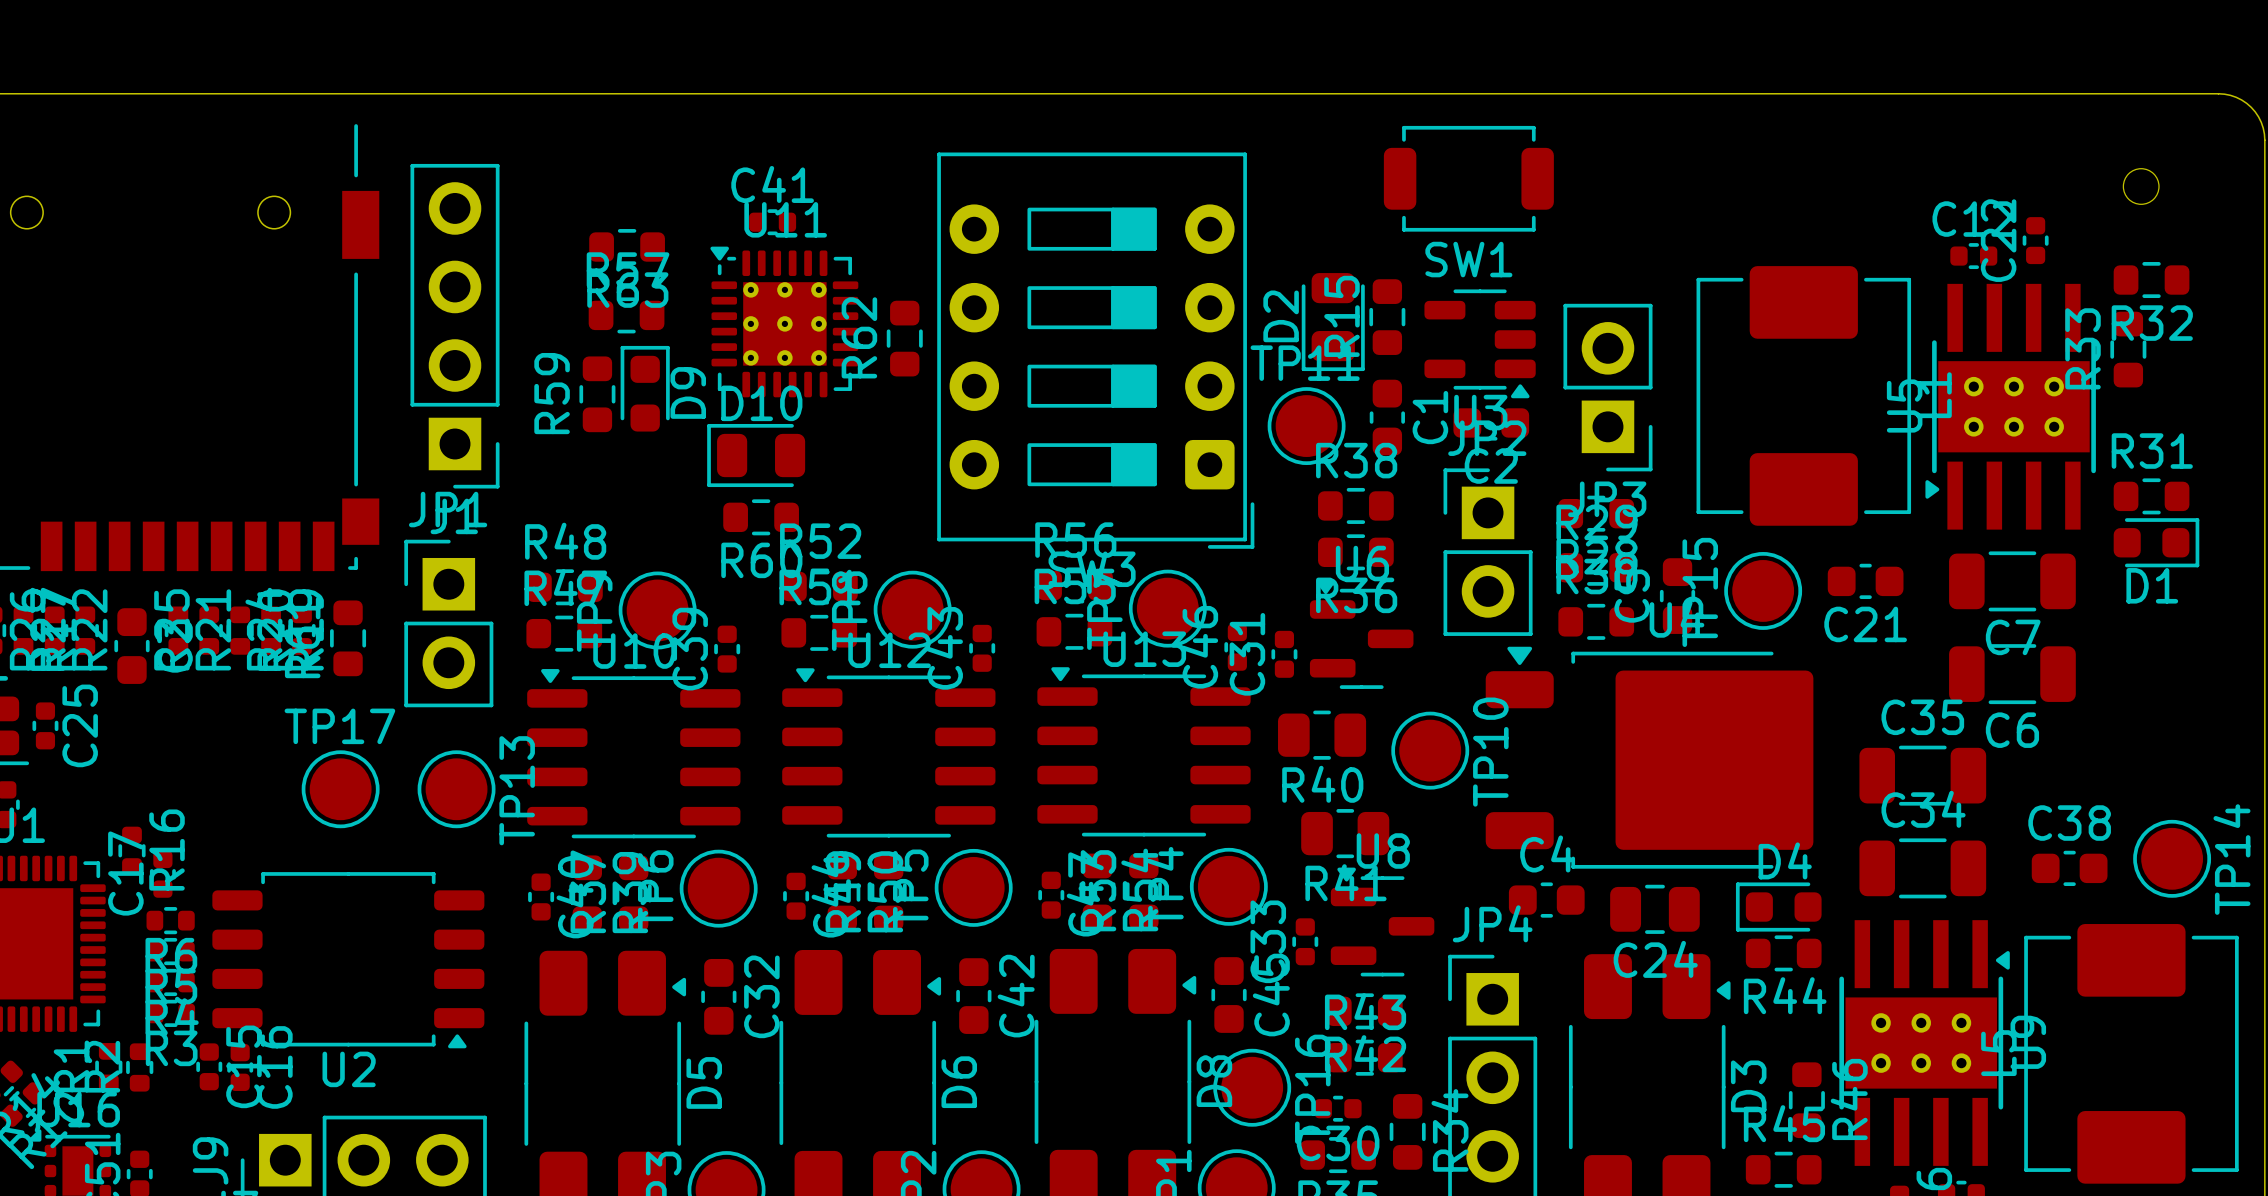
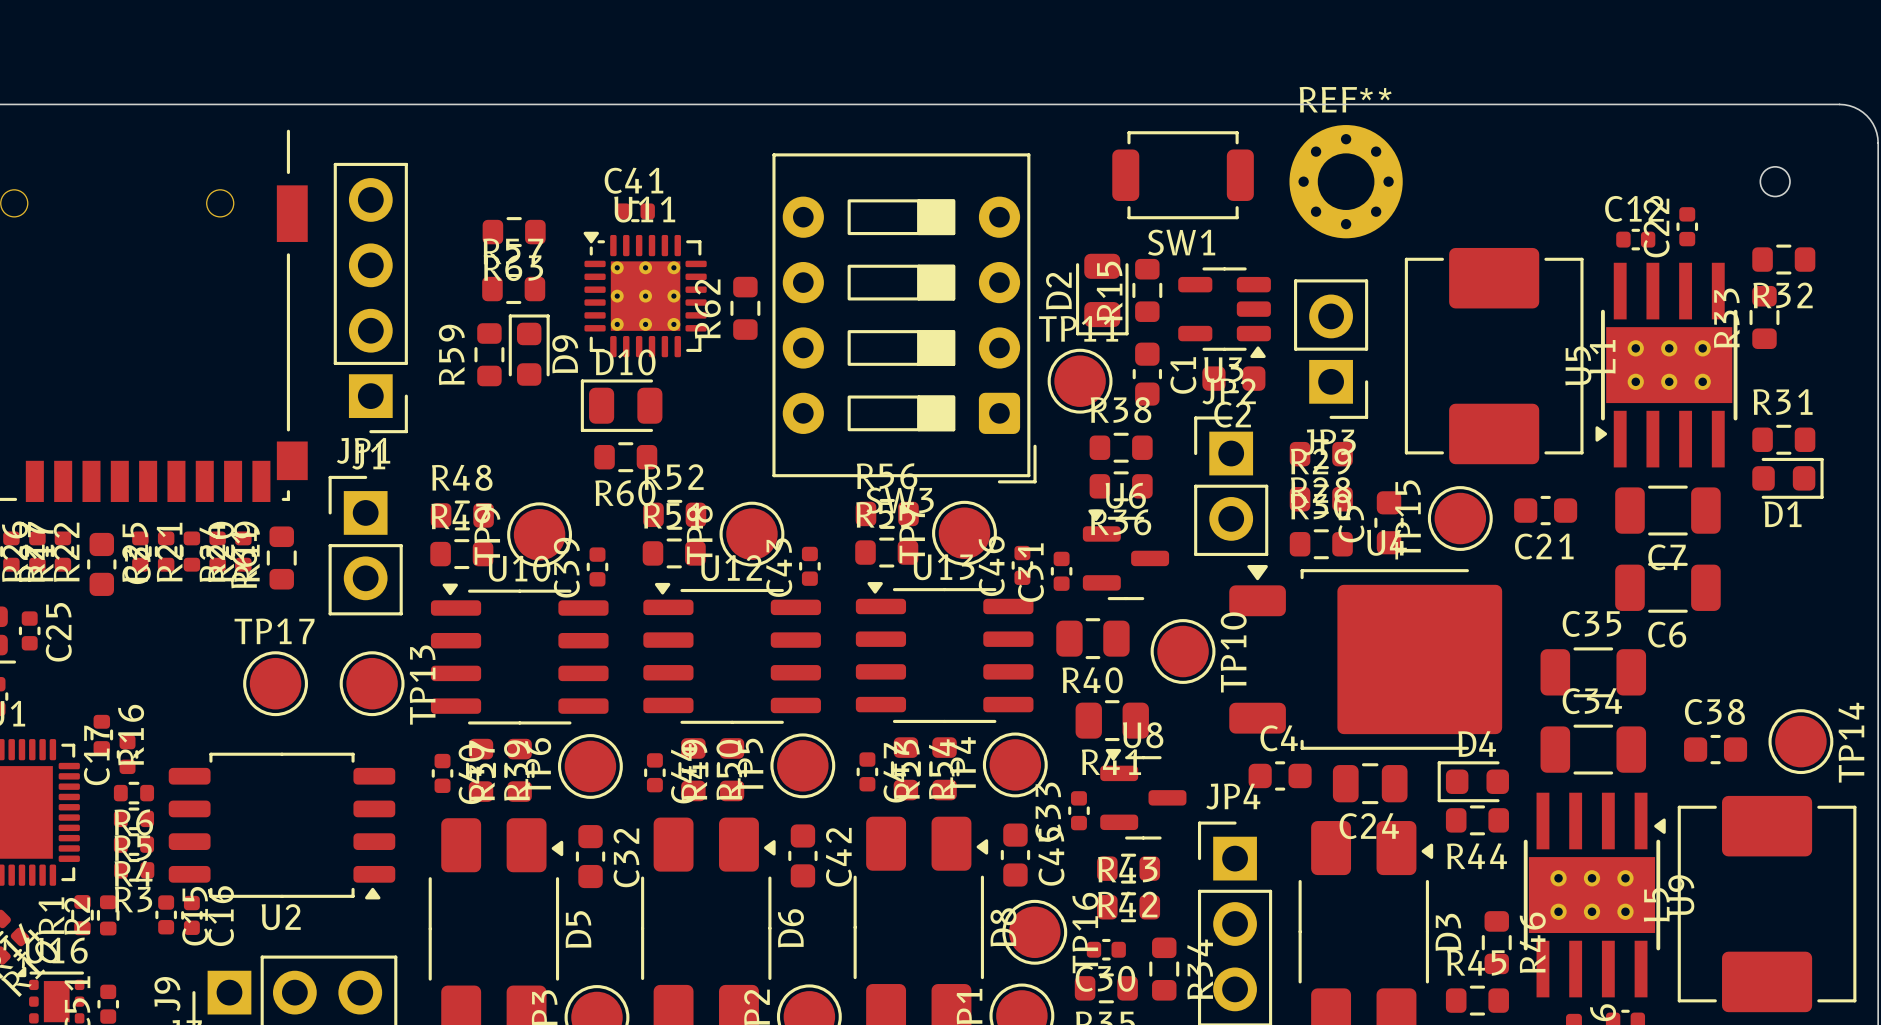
SW1 position: (1468, 178) -> (1183, 175)
REF**: none -> (1346, 181)

